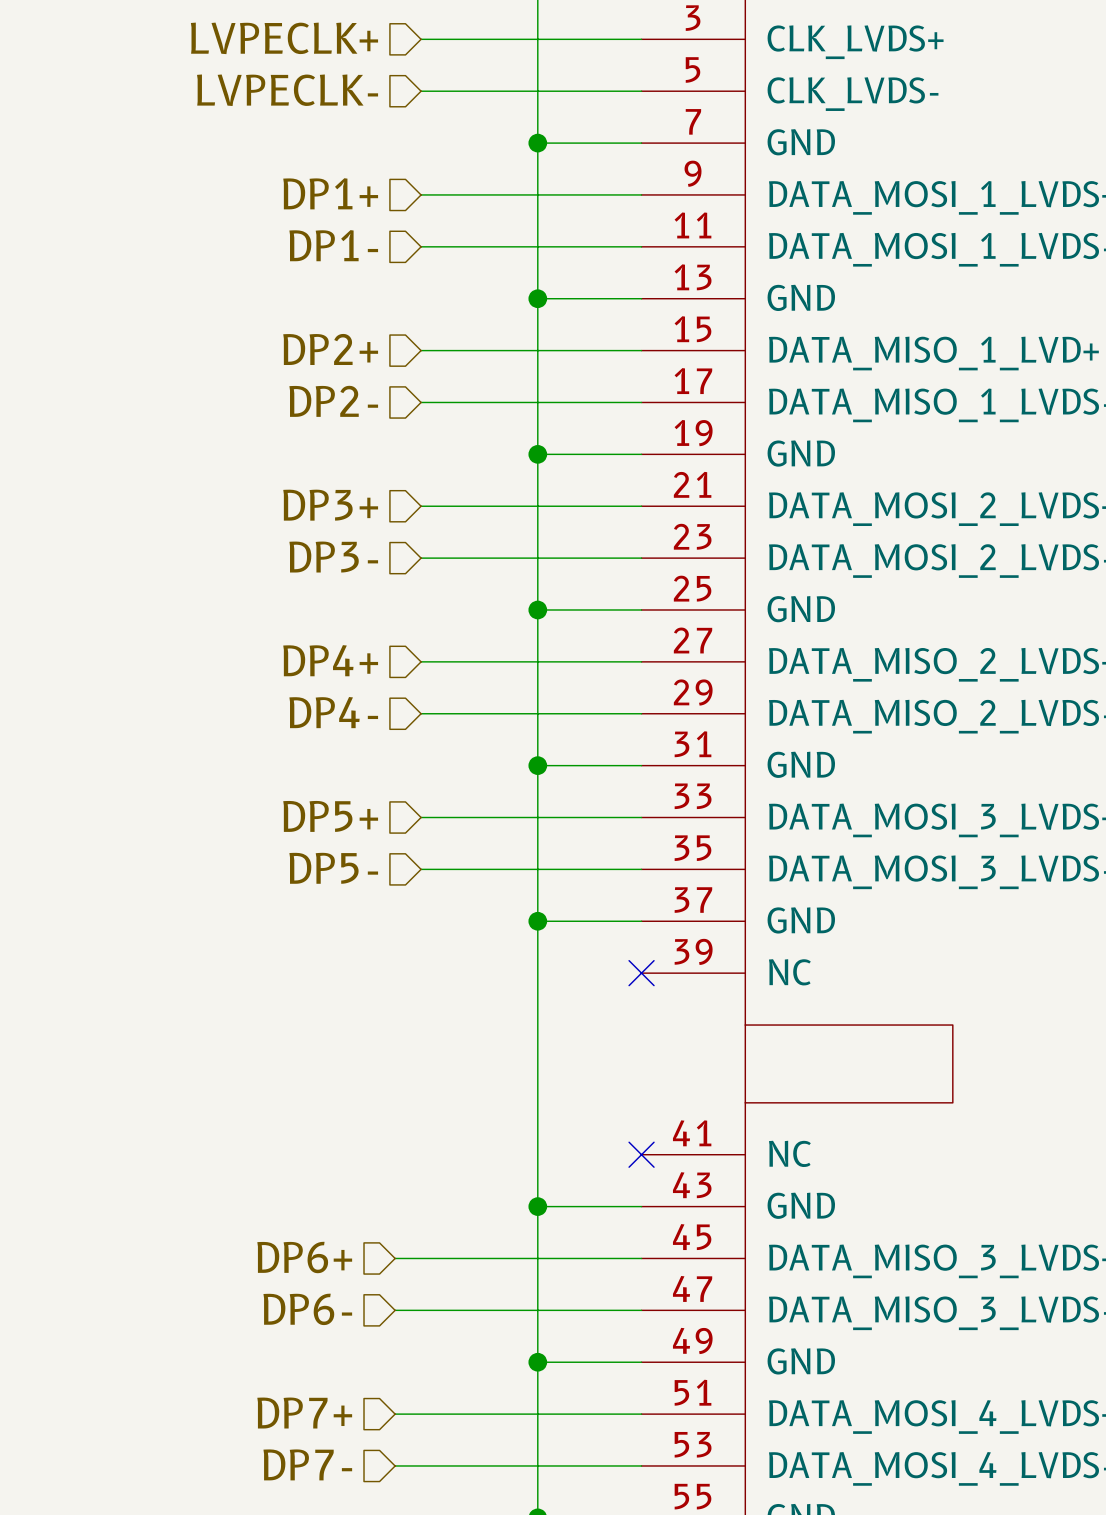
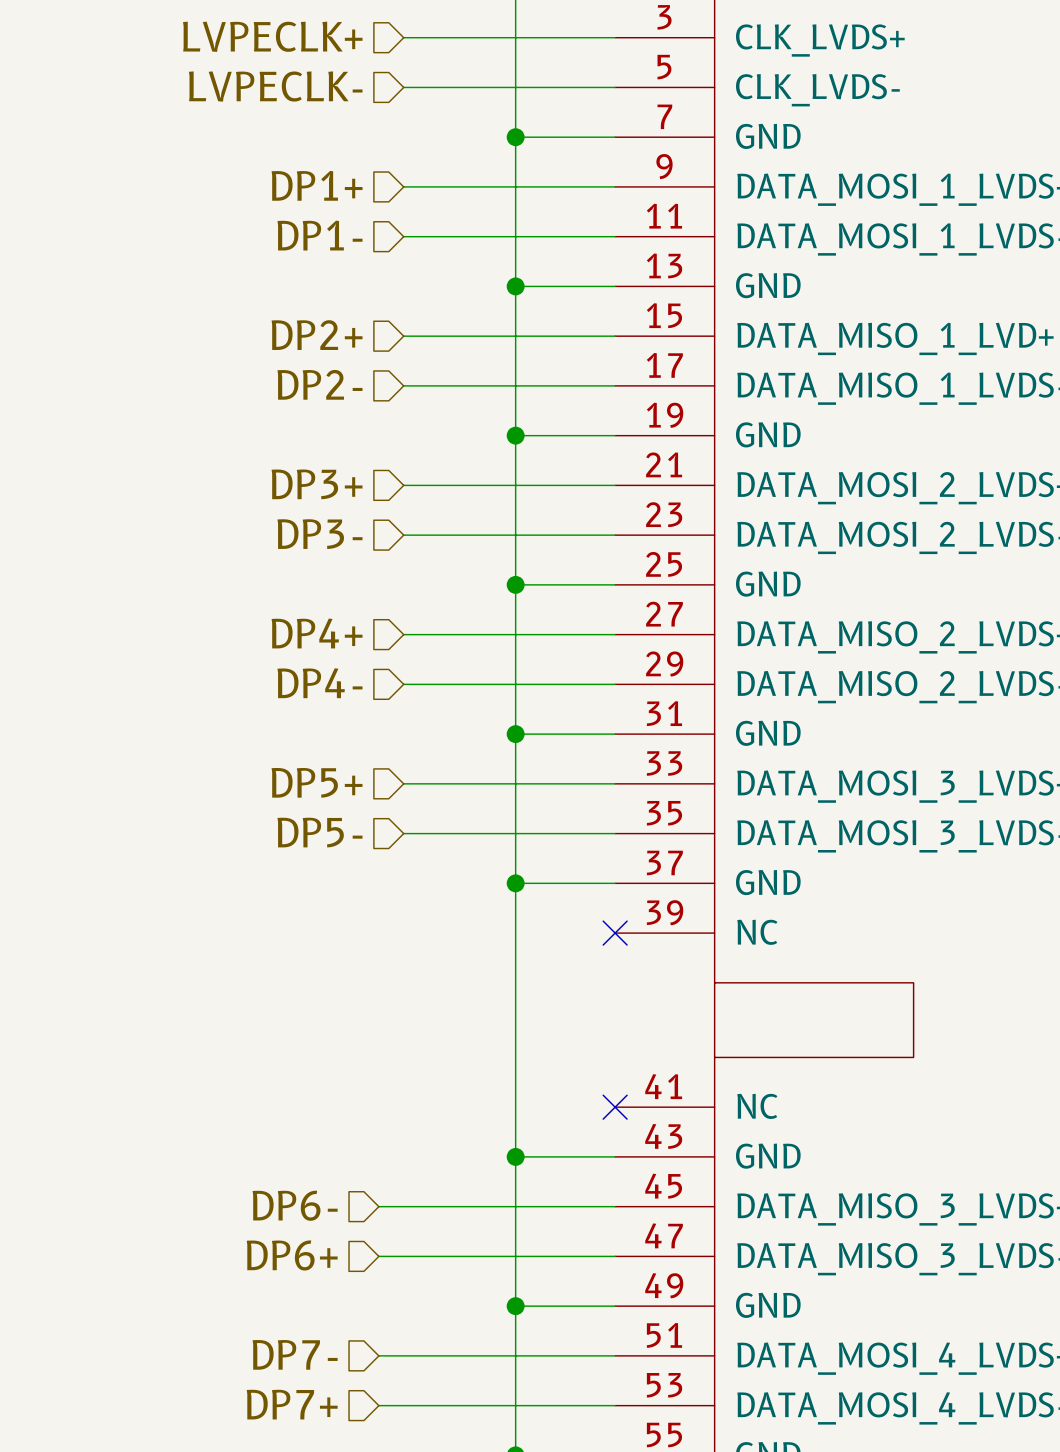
hierarchical label: DP6+ (304, 1257) -> DP6- (295, 1205)
hierarchical label: DP6- (307, 1309) -> DP6+ (292, 1255)
hierarchical label: DP7+ (304, 1413) -> DP7- (295, 1354)
hierarchical label: DP7- (307, 1464) -> DP7+ (292, 1404)

